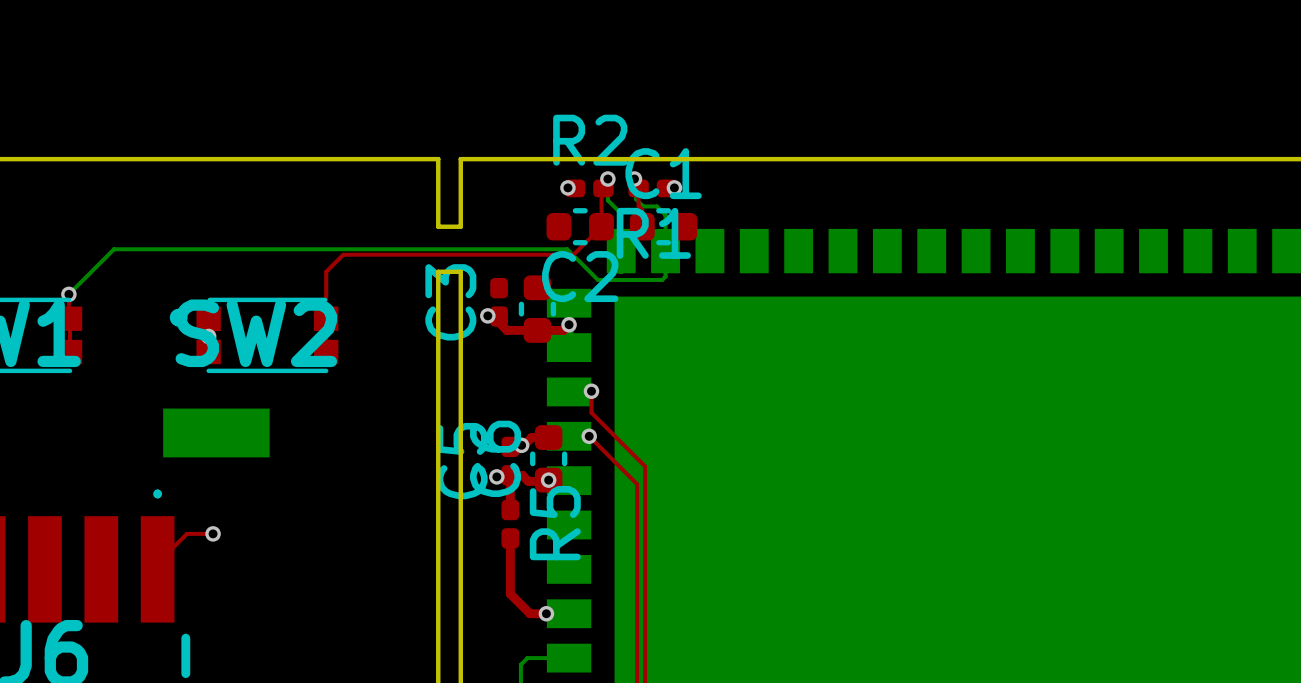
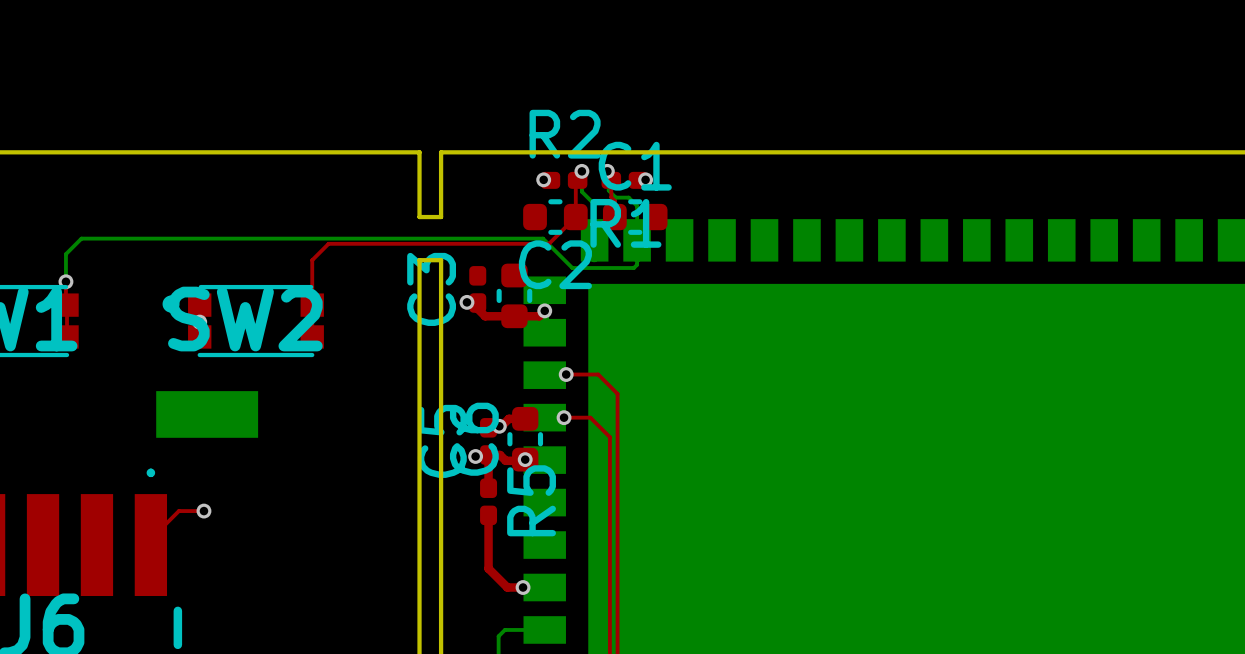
bottom track: (113, 249) (68, 294) -> (109, 238) (81, 238) (65, 254) (65, 281)
top track: (591, 391) (591, 412) (645, 466) -> (566, 374) (598, 374) (617, 393) (617, 446)
top track: (589, 436) (637, 484) -> (564, 417) (590, 417) (609, 437) (609, 463)

